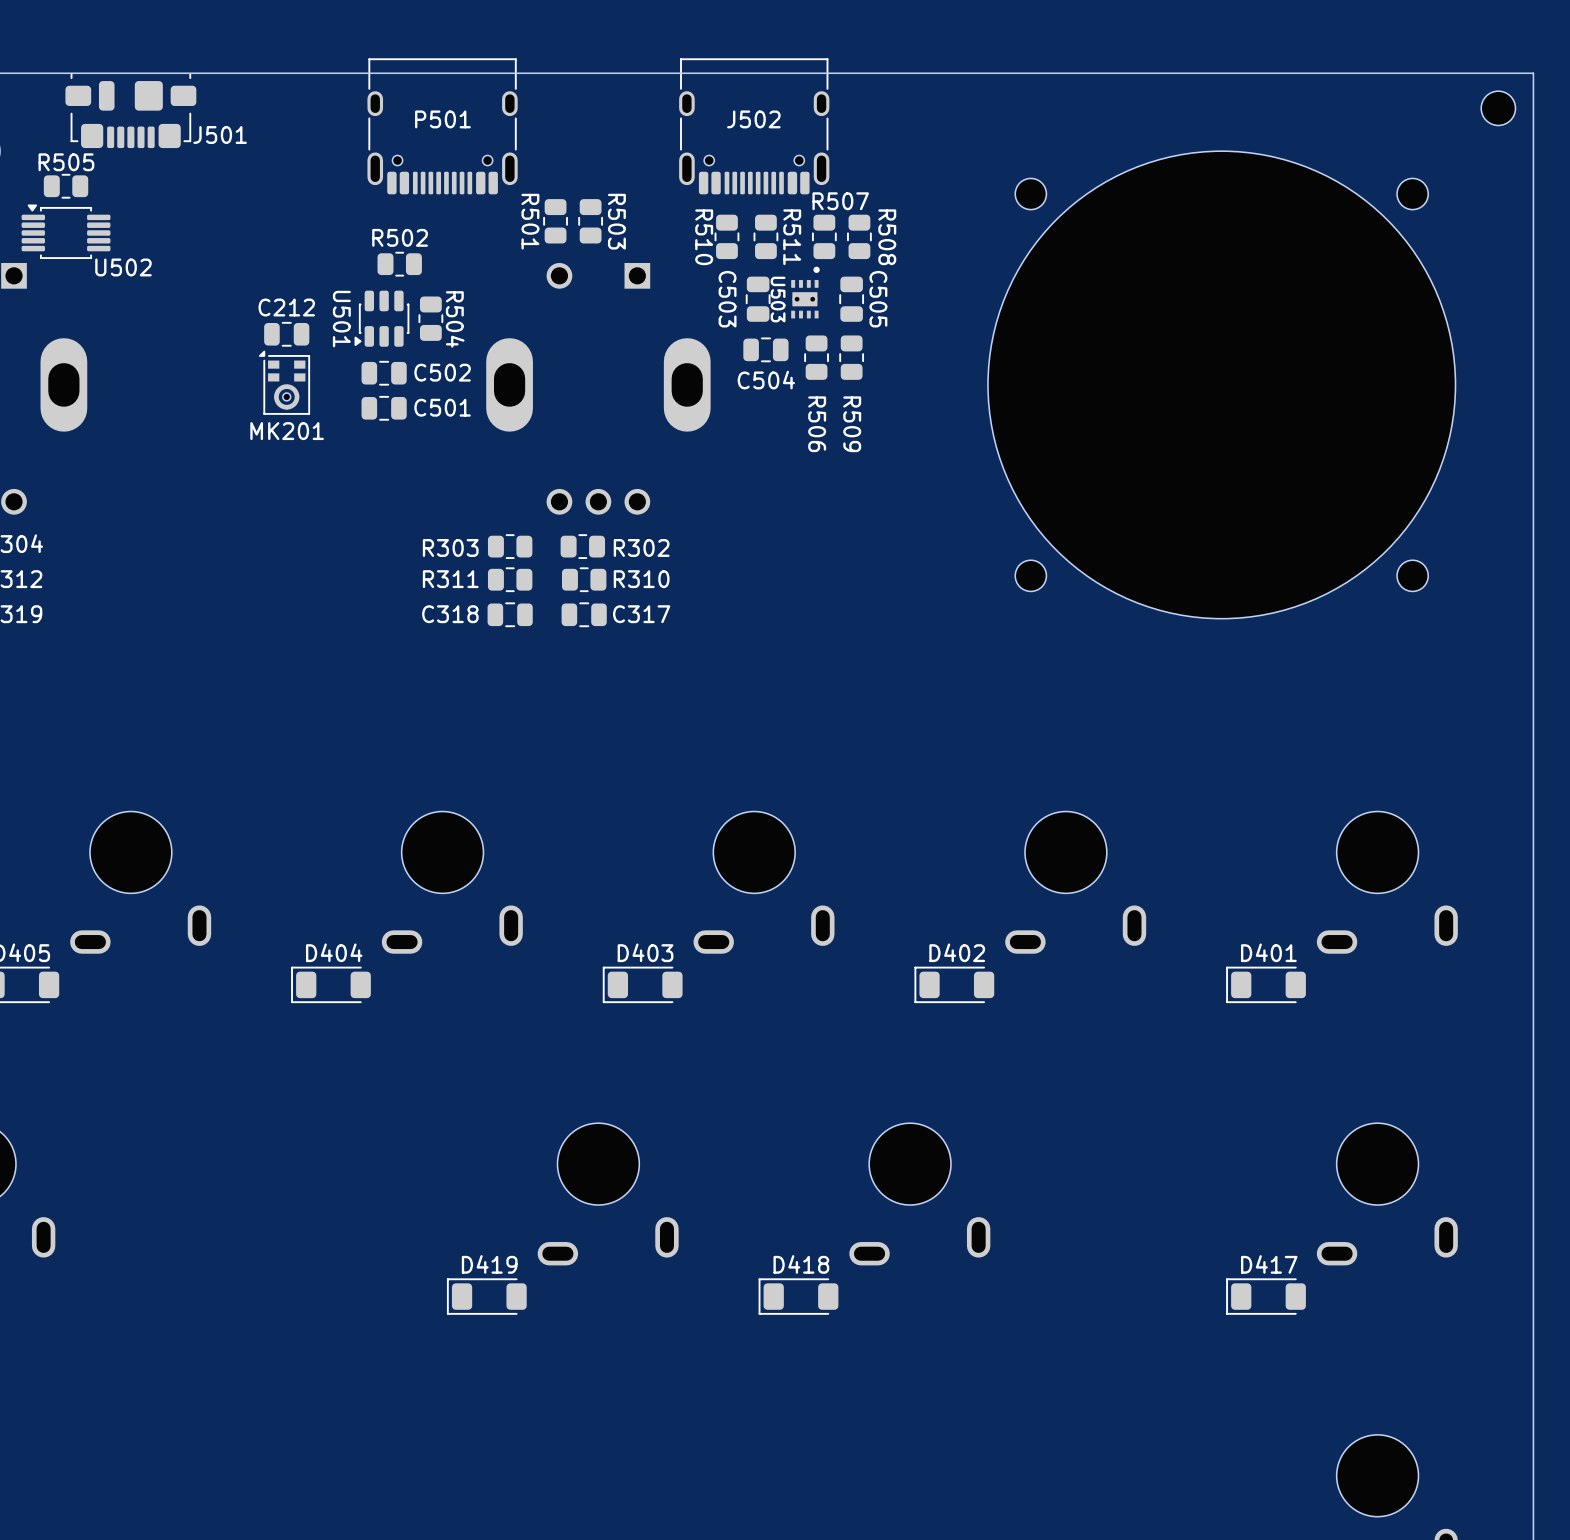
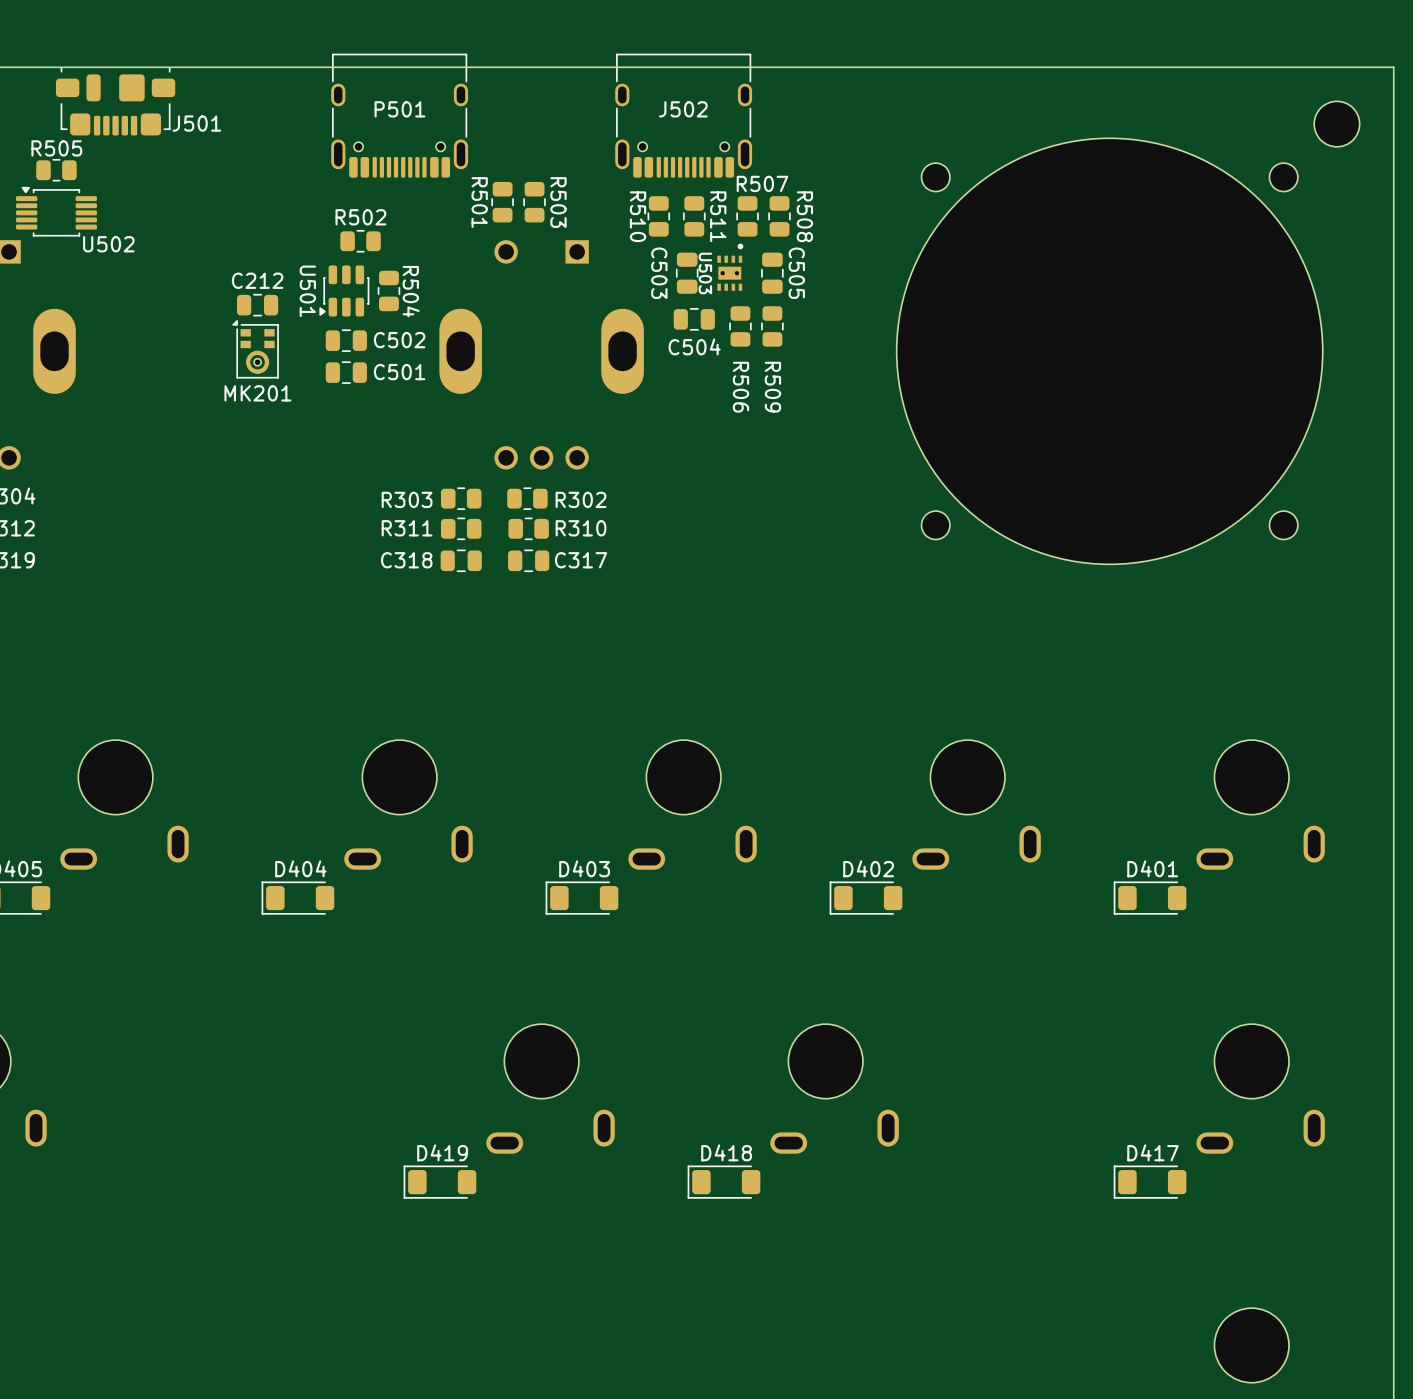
part: (1498, 108) -> none
part: none -> (1336, 124)

